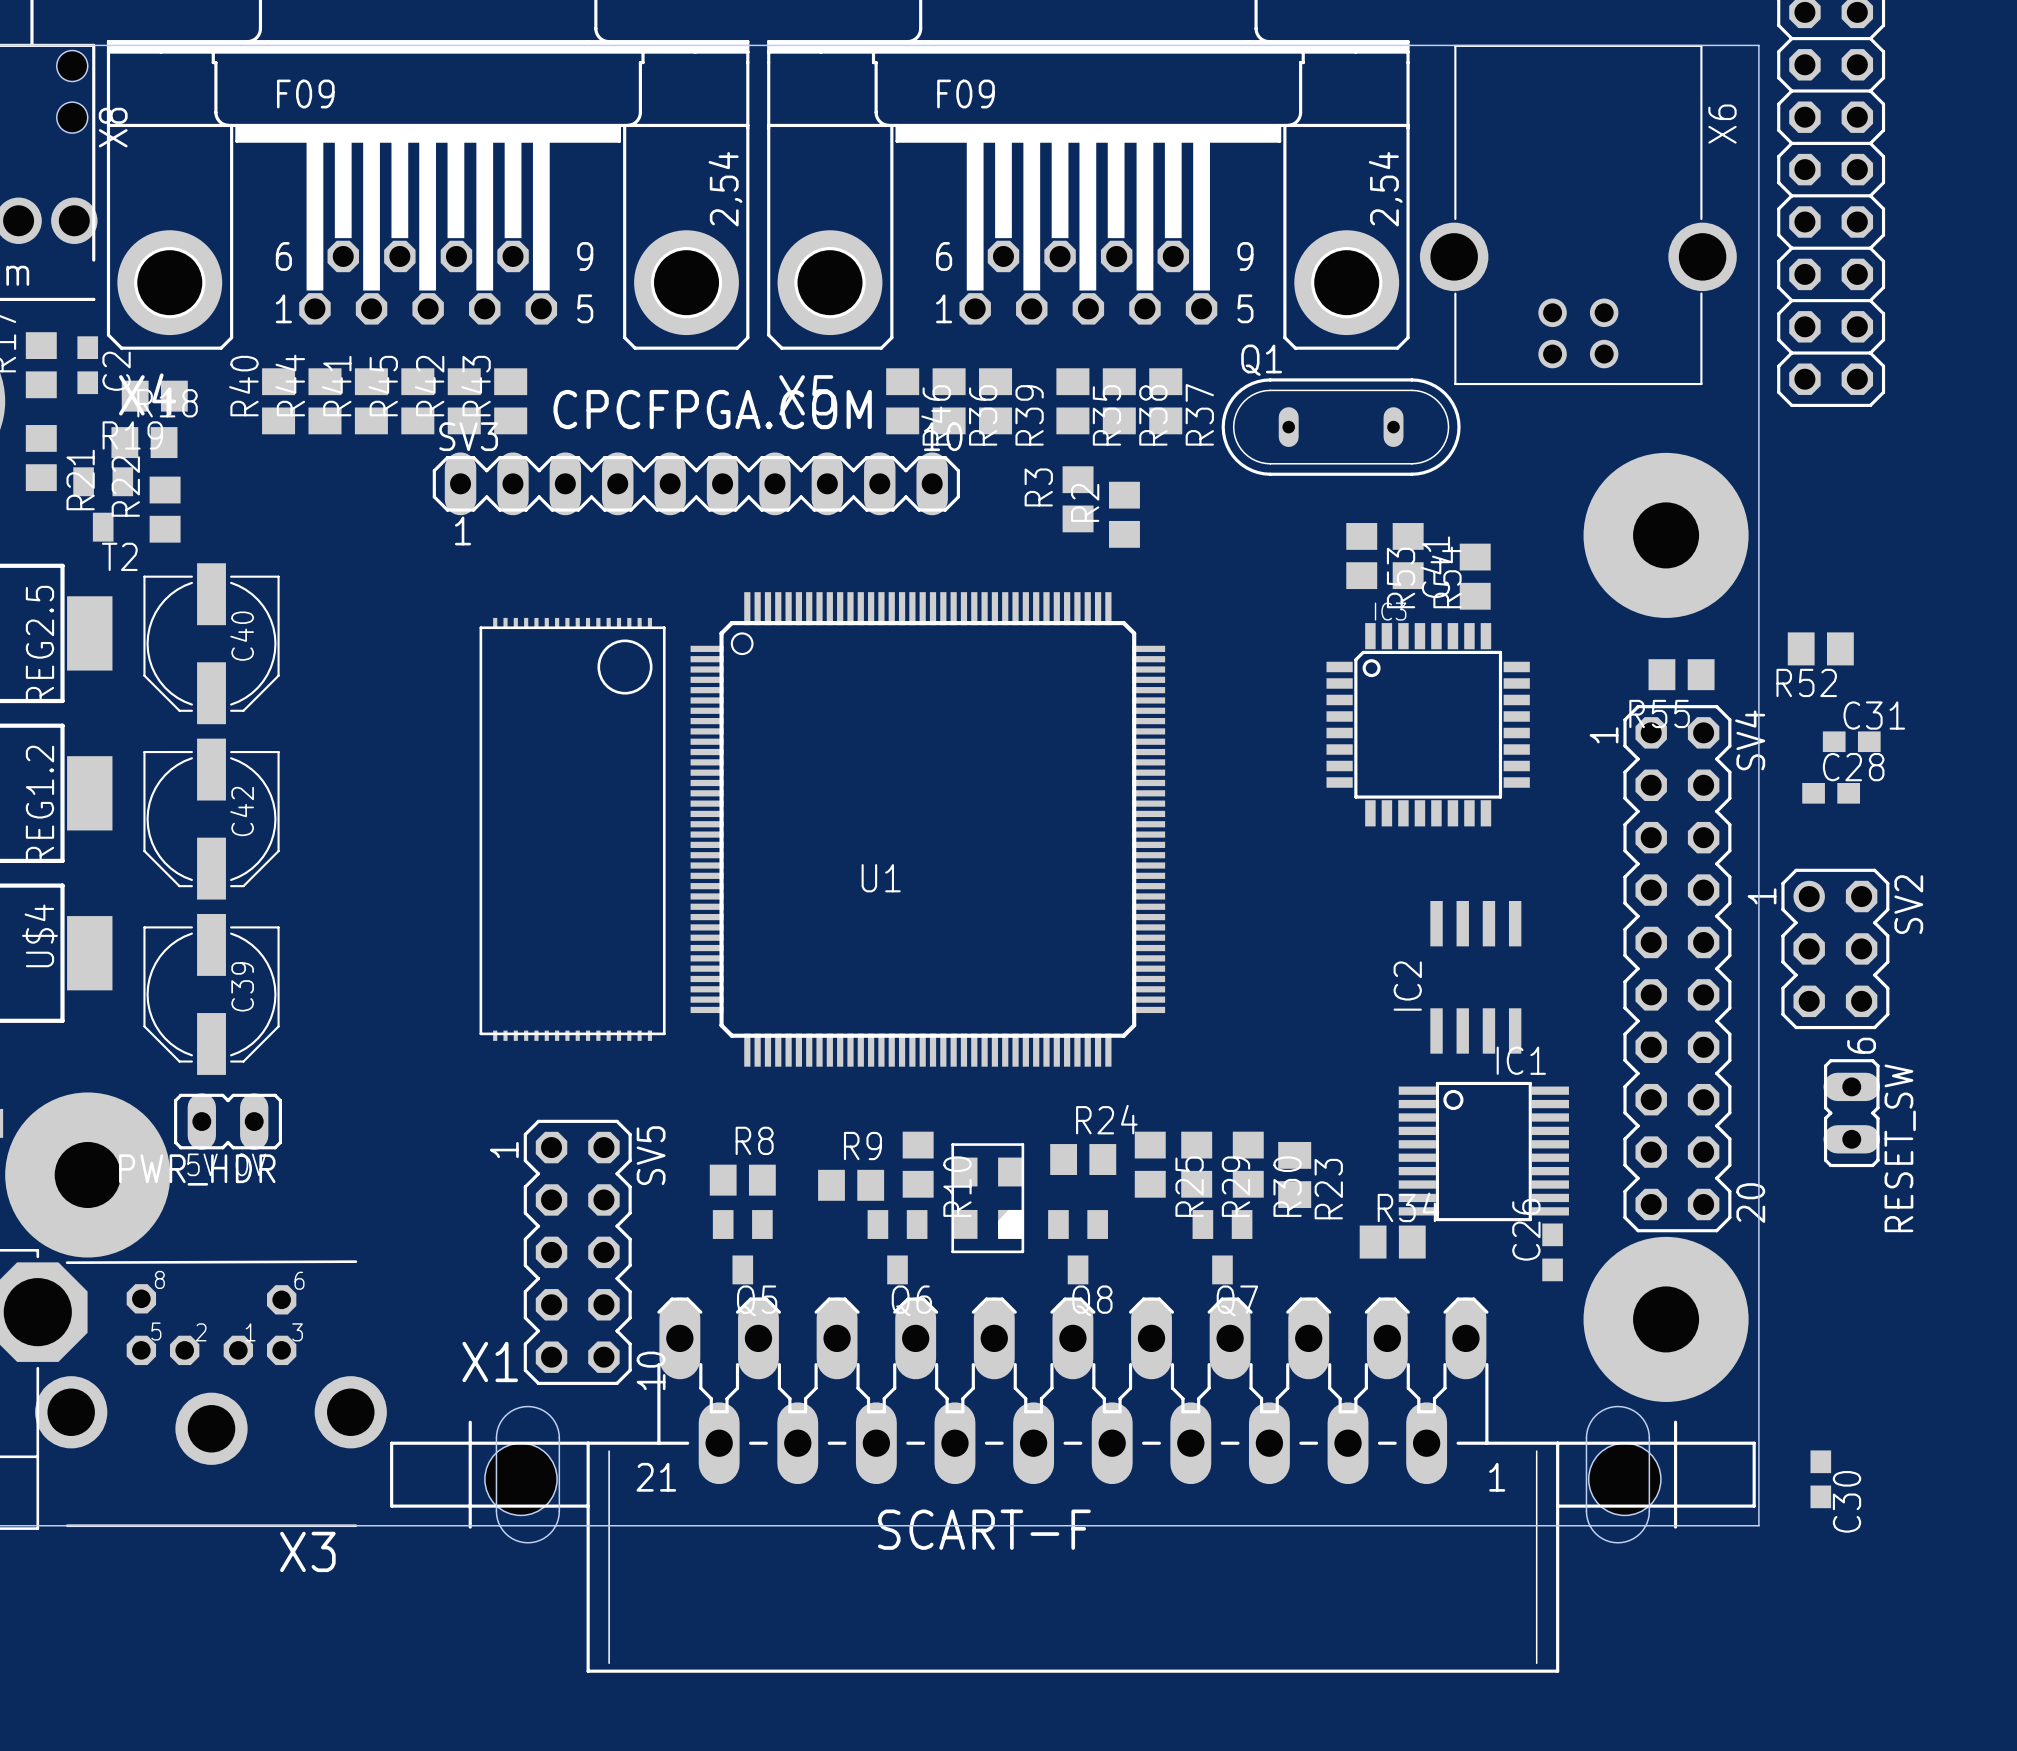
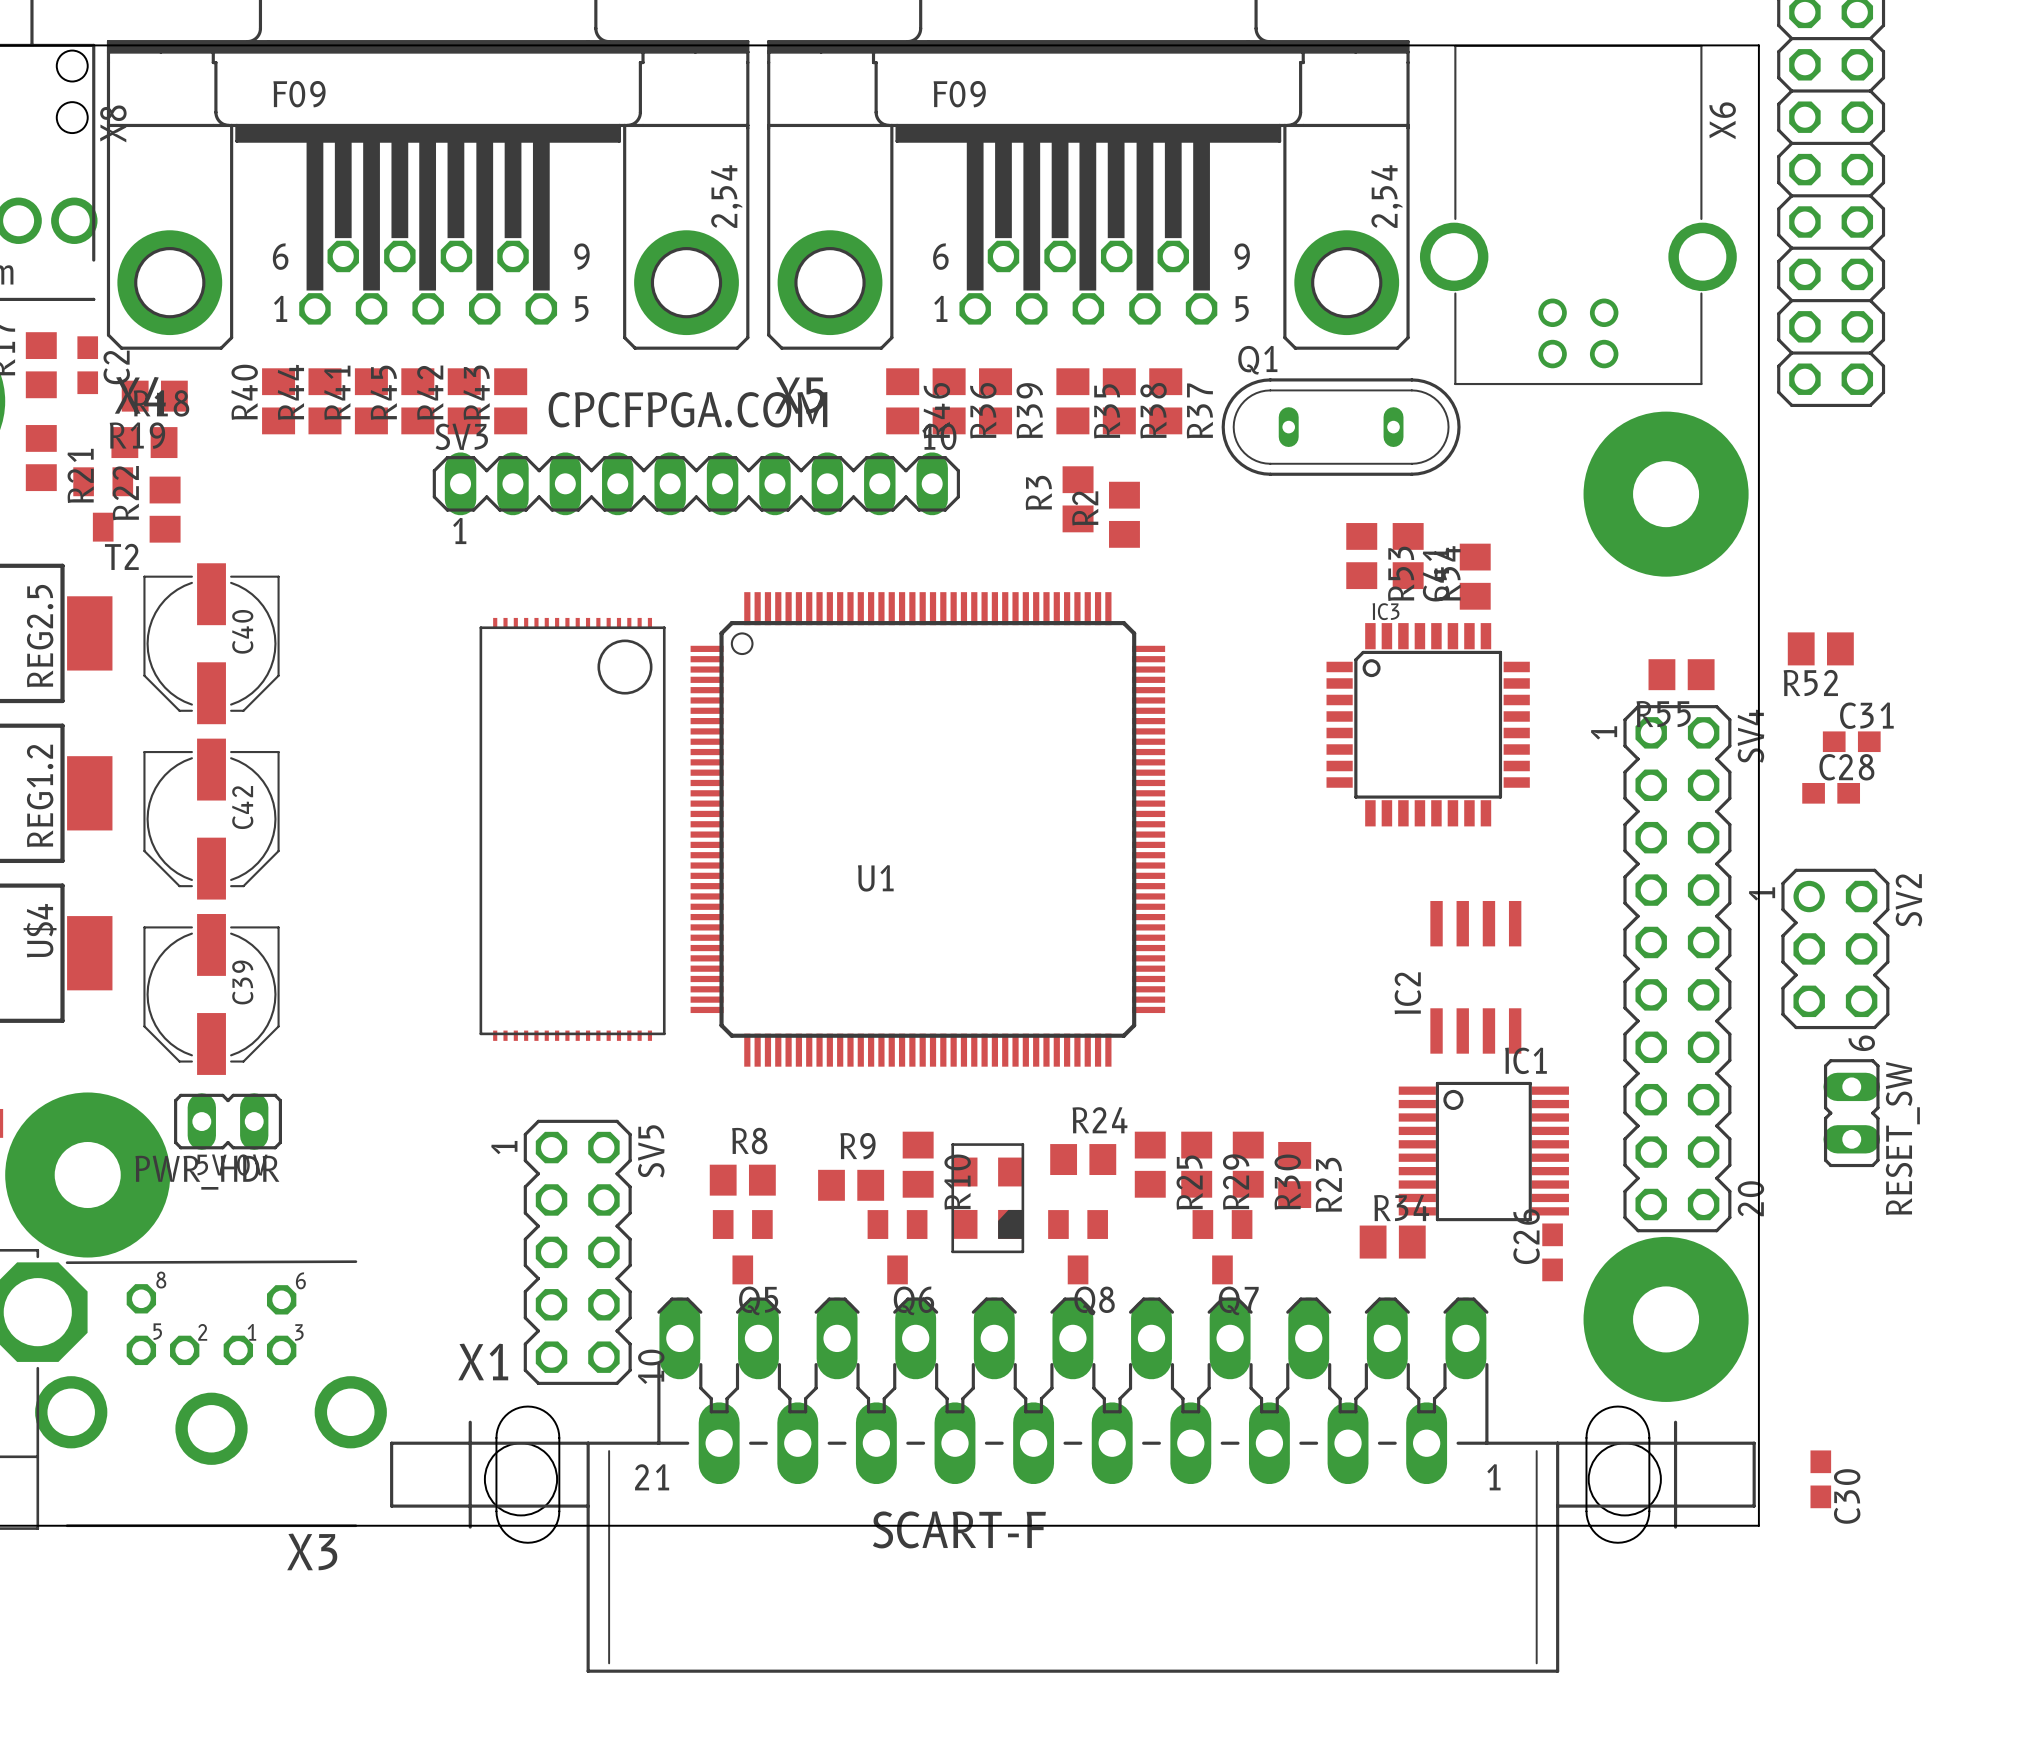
part position: (1666, 535) -> (1666, 494)

